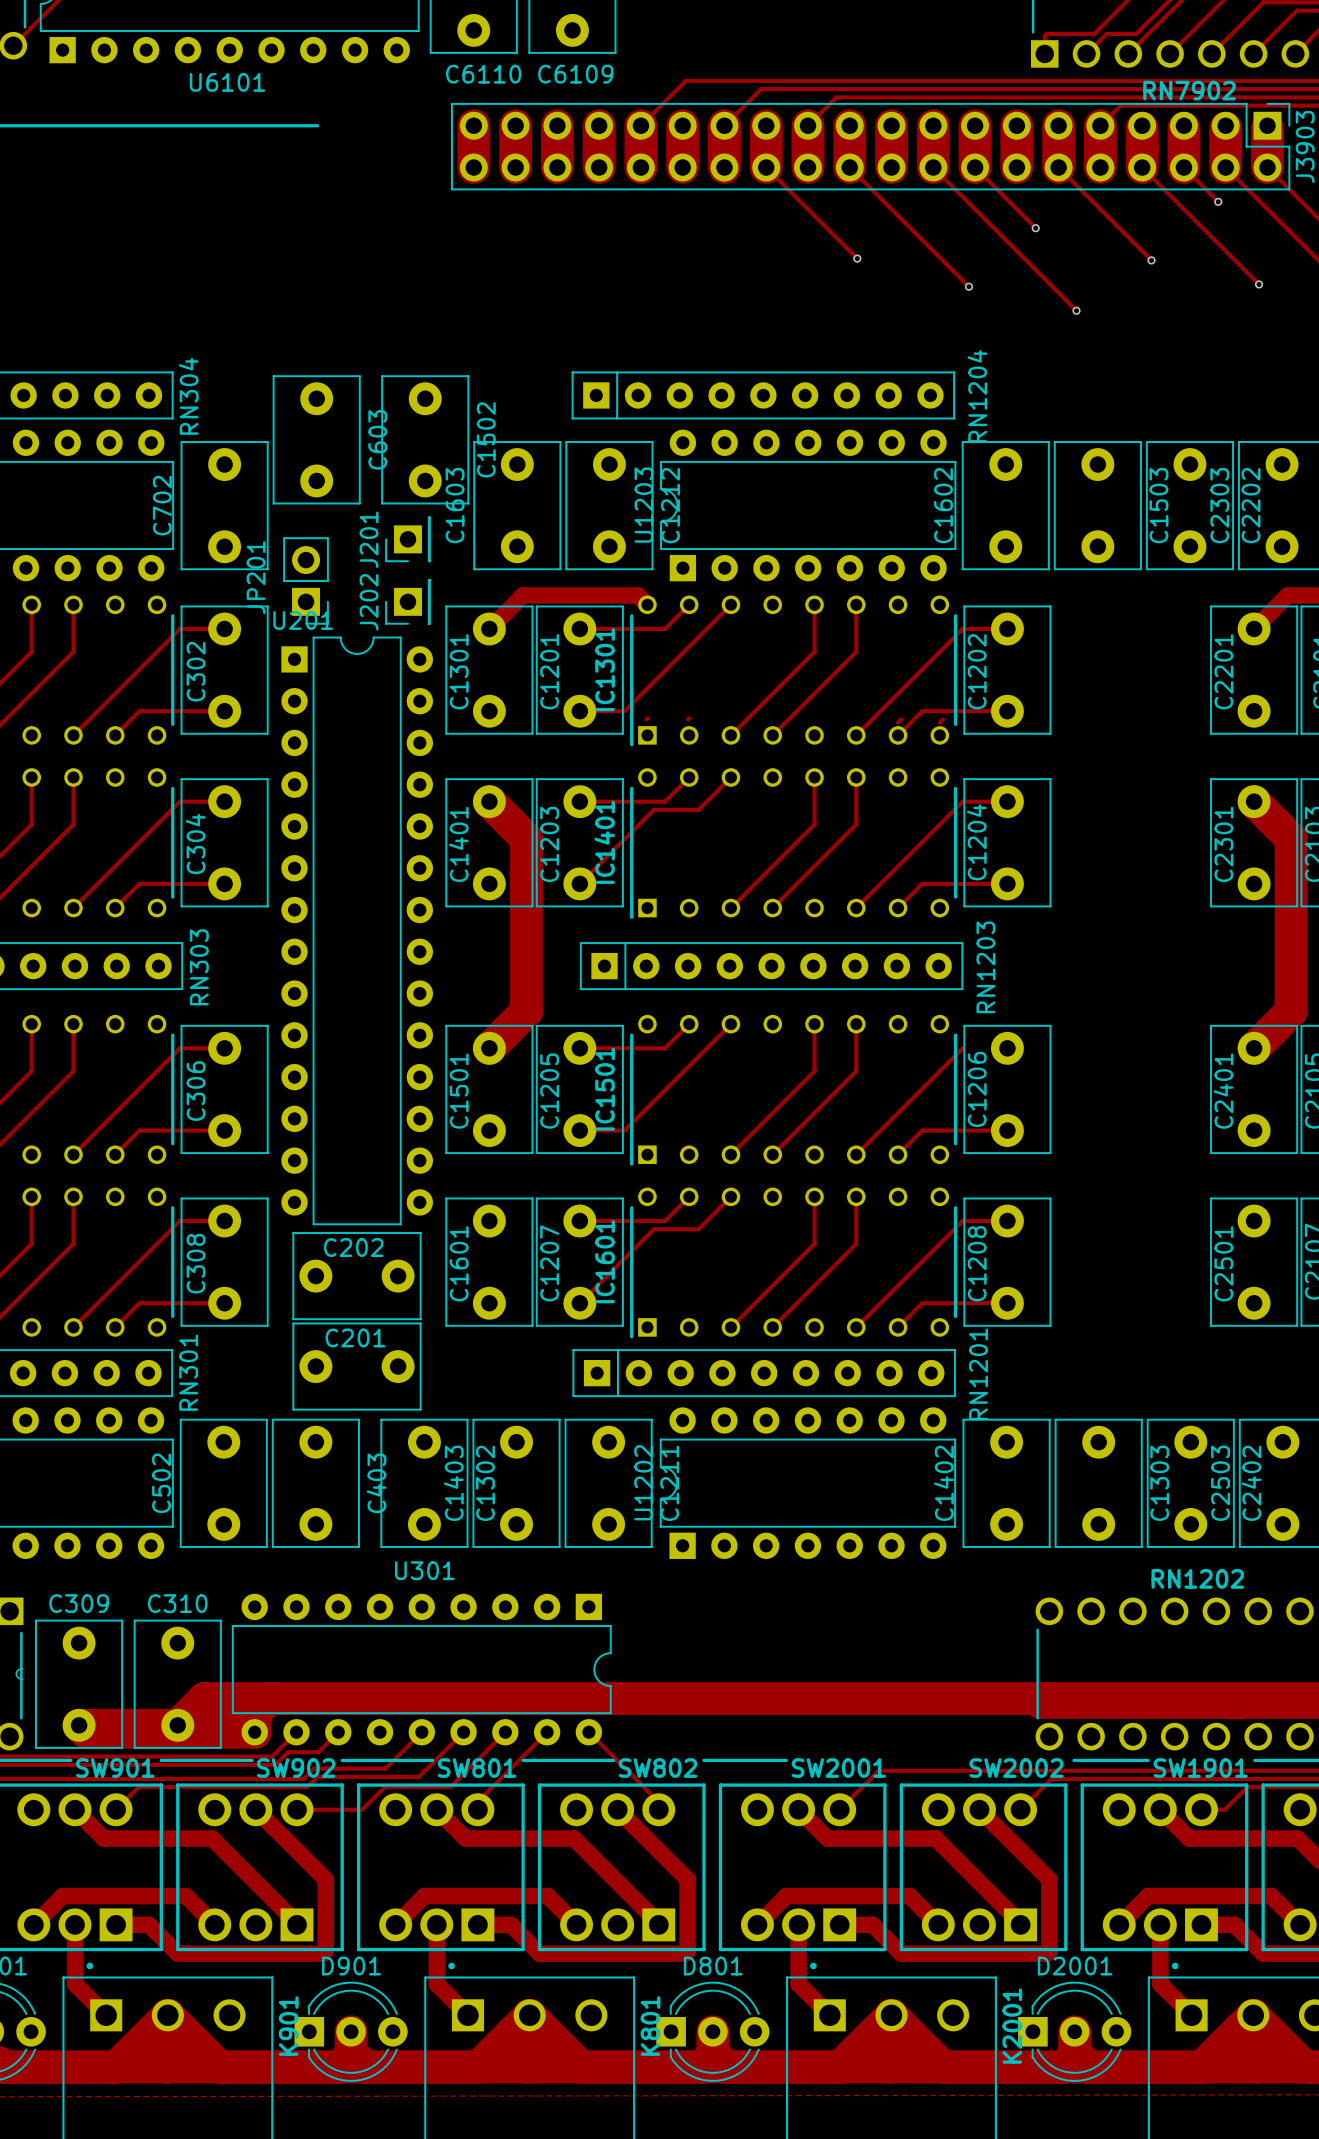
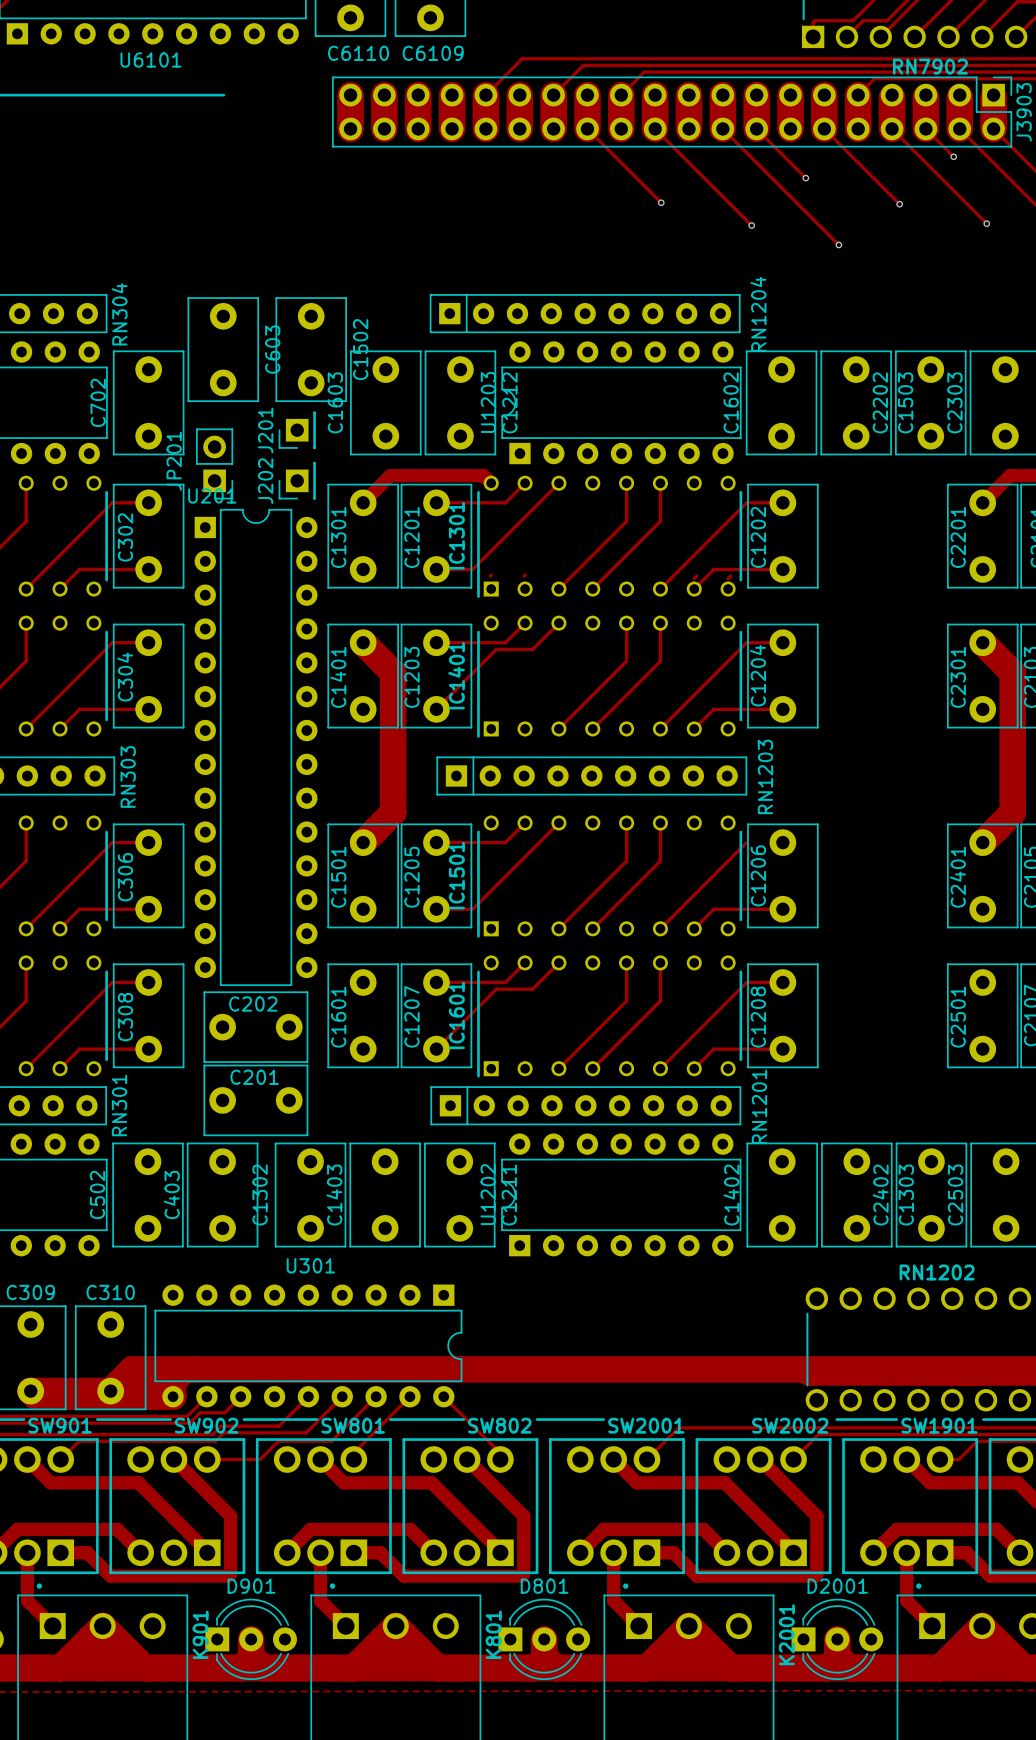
C2202 name position: C2202 (1251, 505) -> C2202 (880, 402)
C403 name position: C403 (376, 1483) -> C403 (171, 1195)
C1302 name position: C1302 (485, 1483) -> C1302 (260, 1195)
C2402 name position: C2402 (1251, 1483) -> C2402 (880, 1195)

